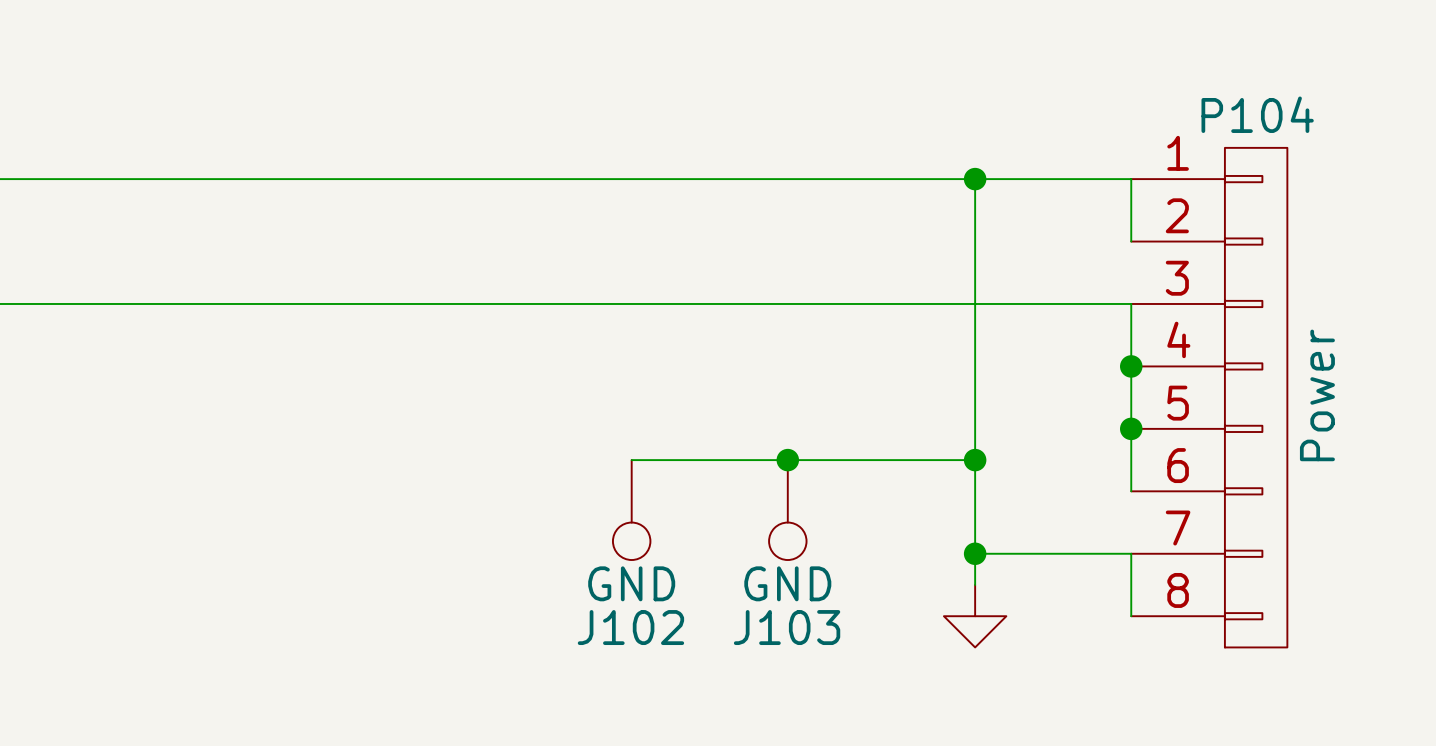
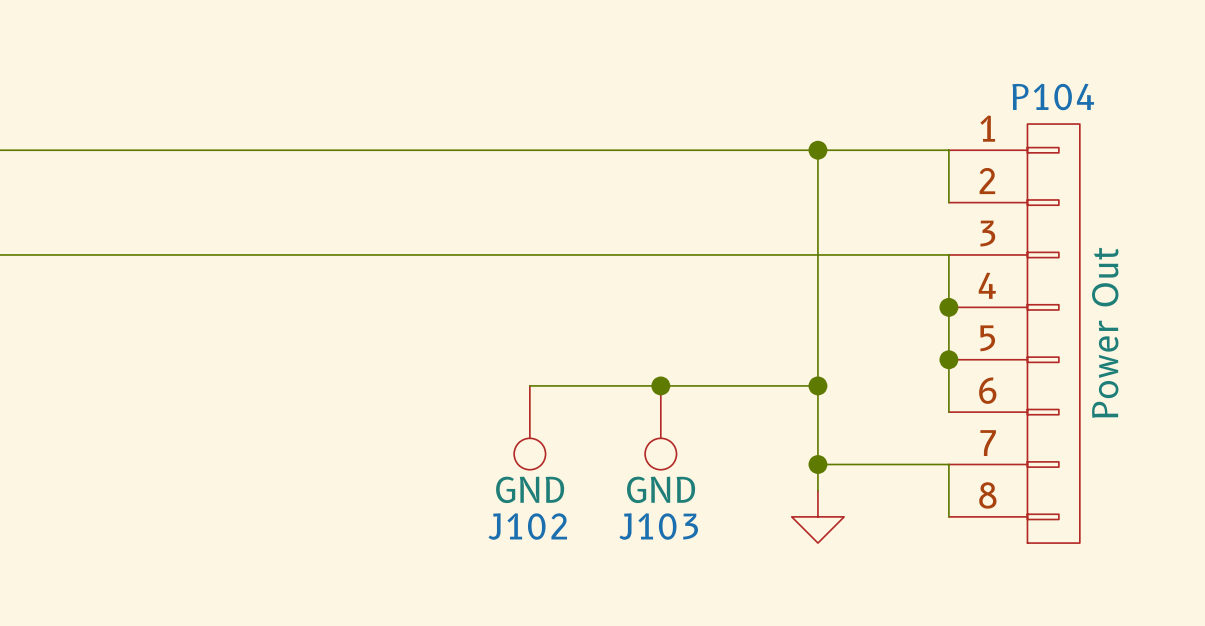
P104 value: Power (1317, 395) -> Power Out (1105, 332)

